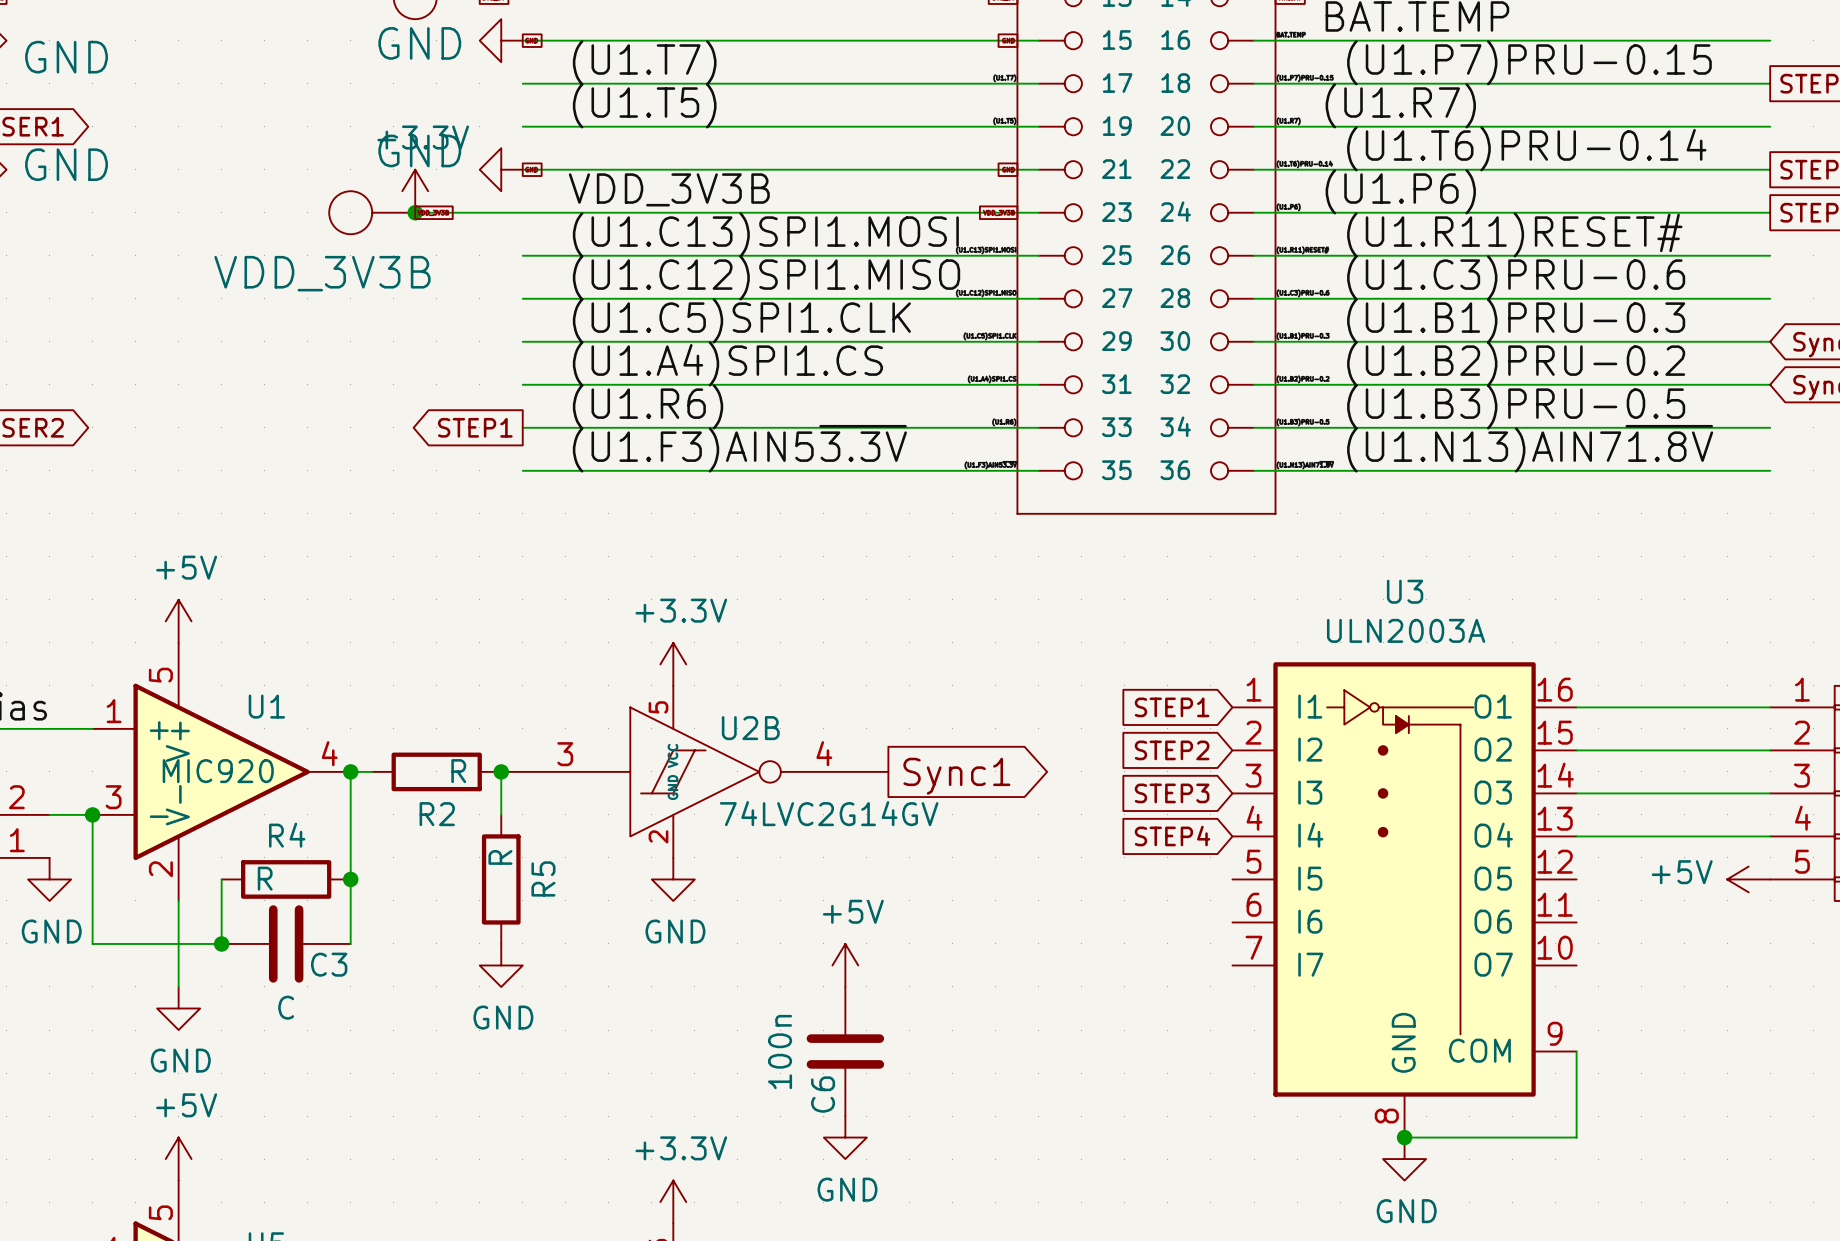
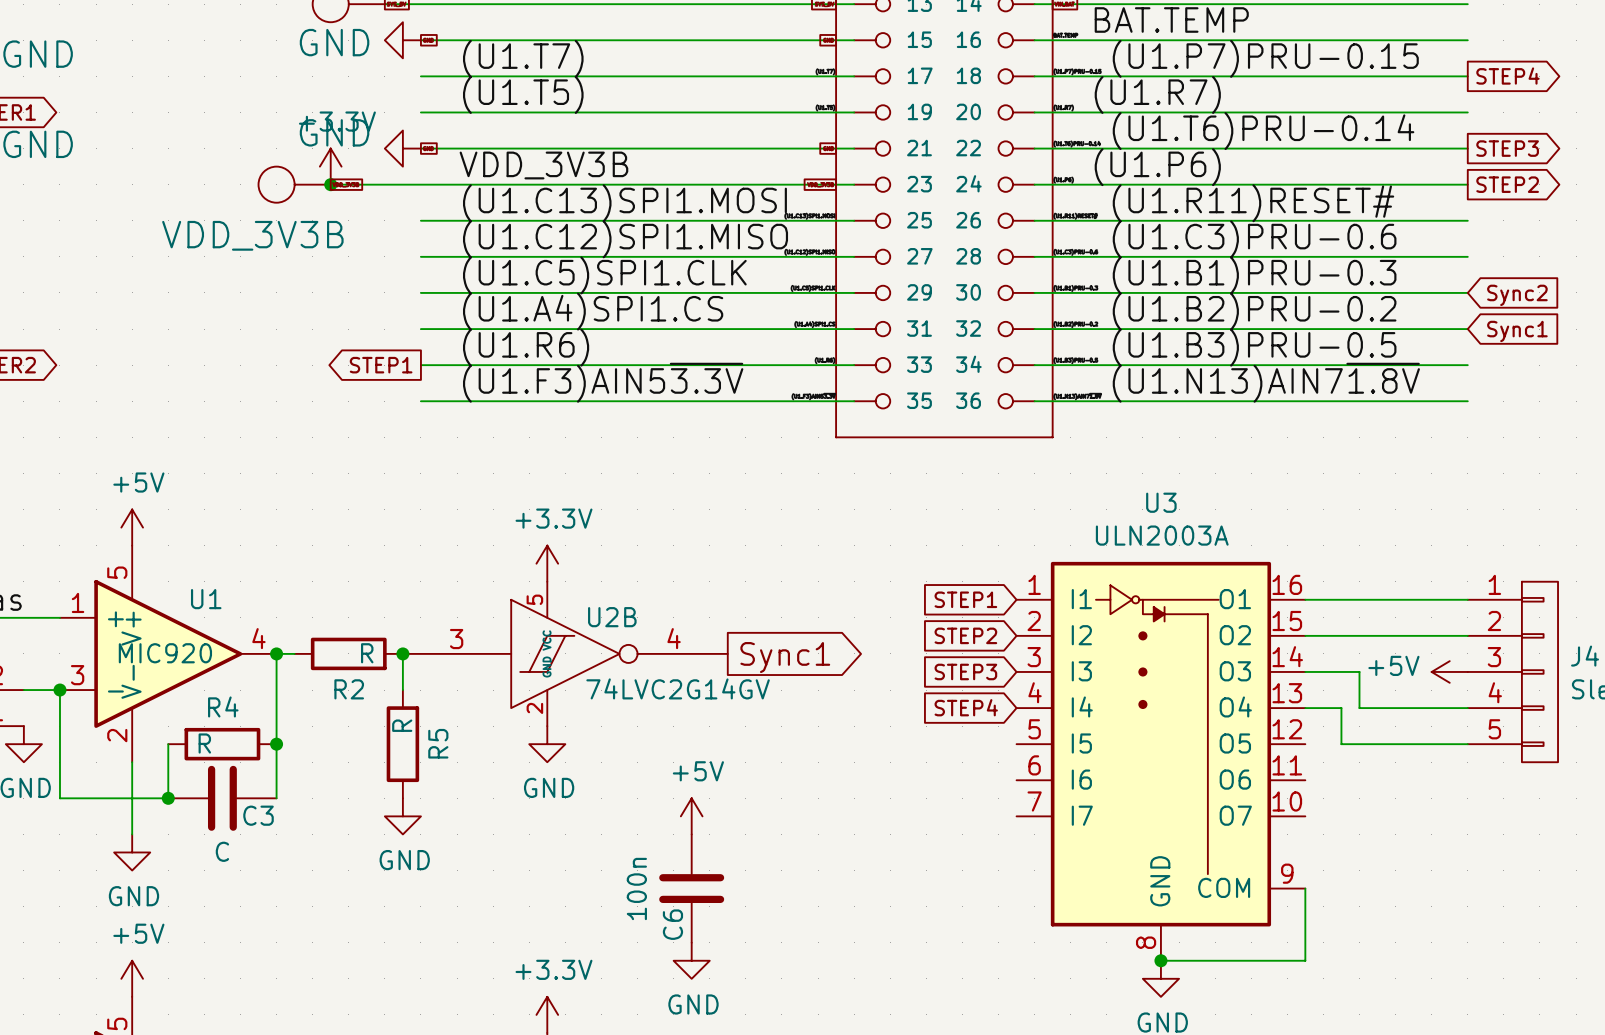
wire: (1641, 793) (1770, 793) -> none
wire: (1619, 836) (1641, 836) -> (1359, 671) (1359, 708)
wire: none -> (1341, 708) (1341, 744) (1467, 744)
power symbol position: +5V (1748, 879) -> +5V (1449, 671)

